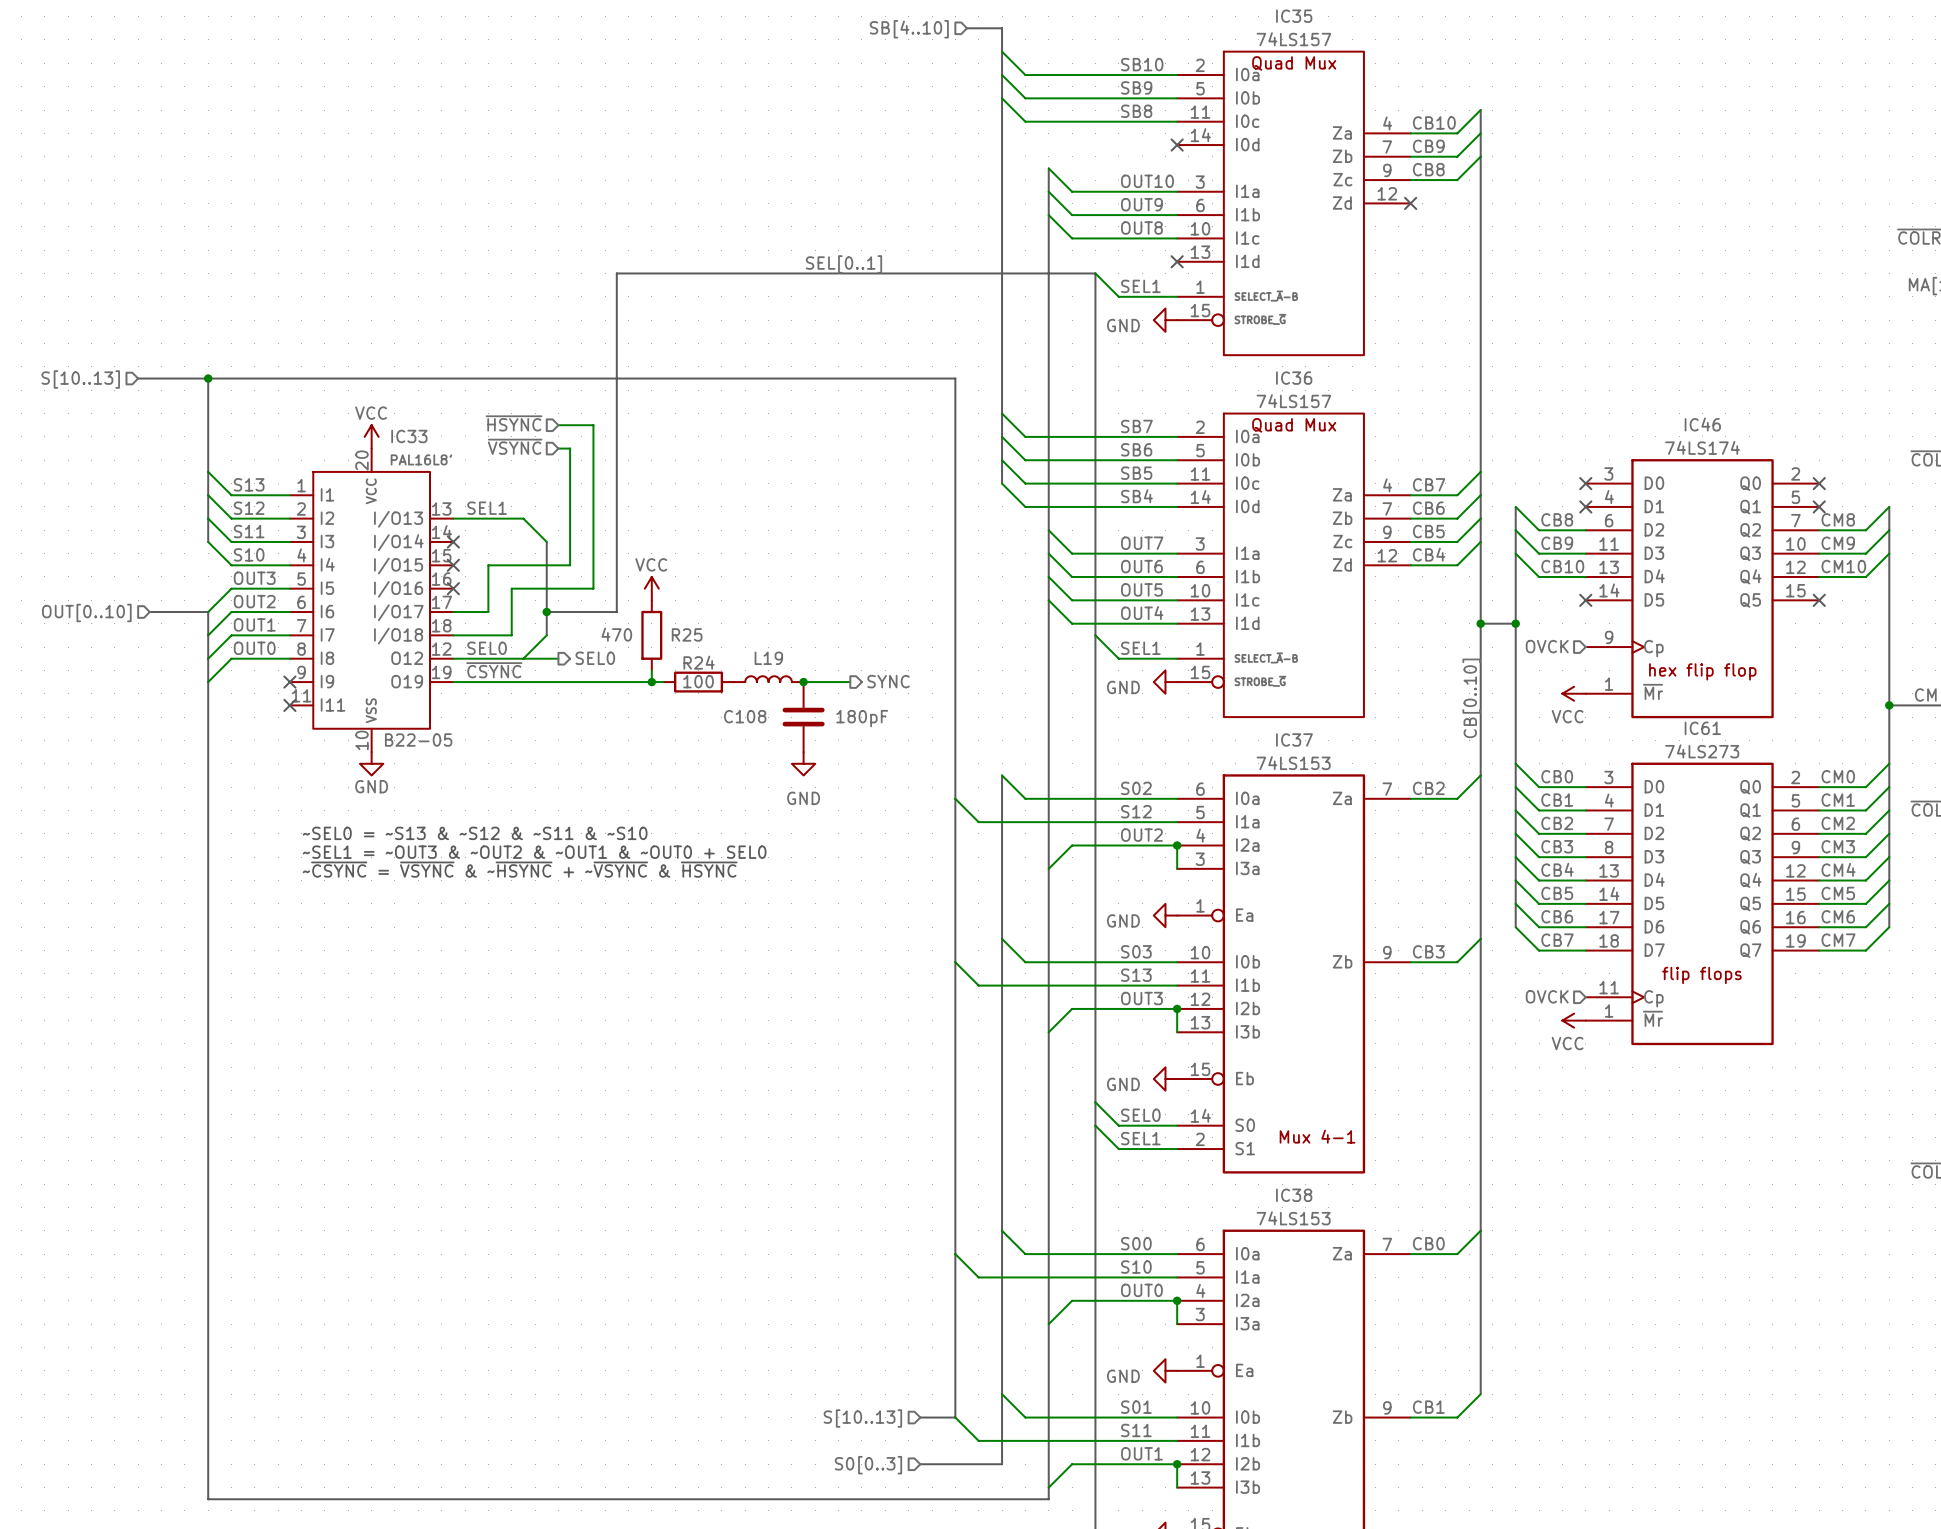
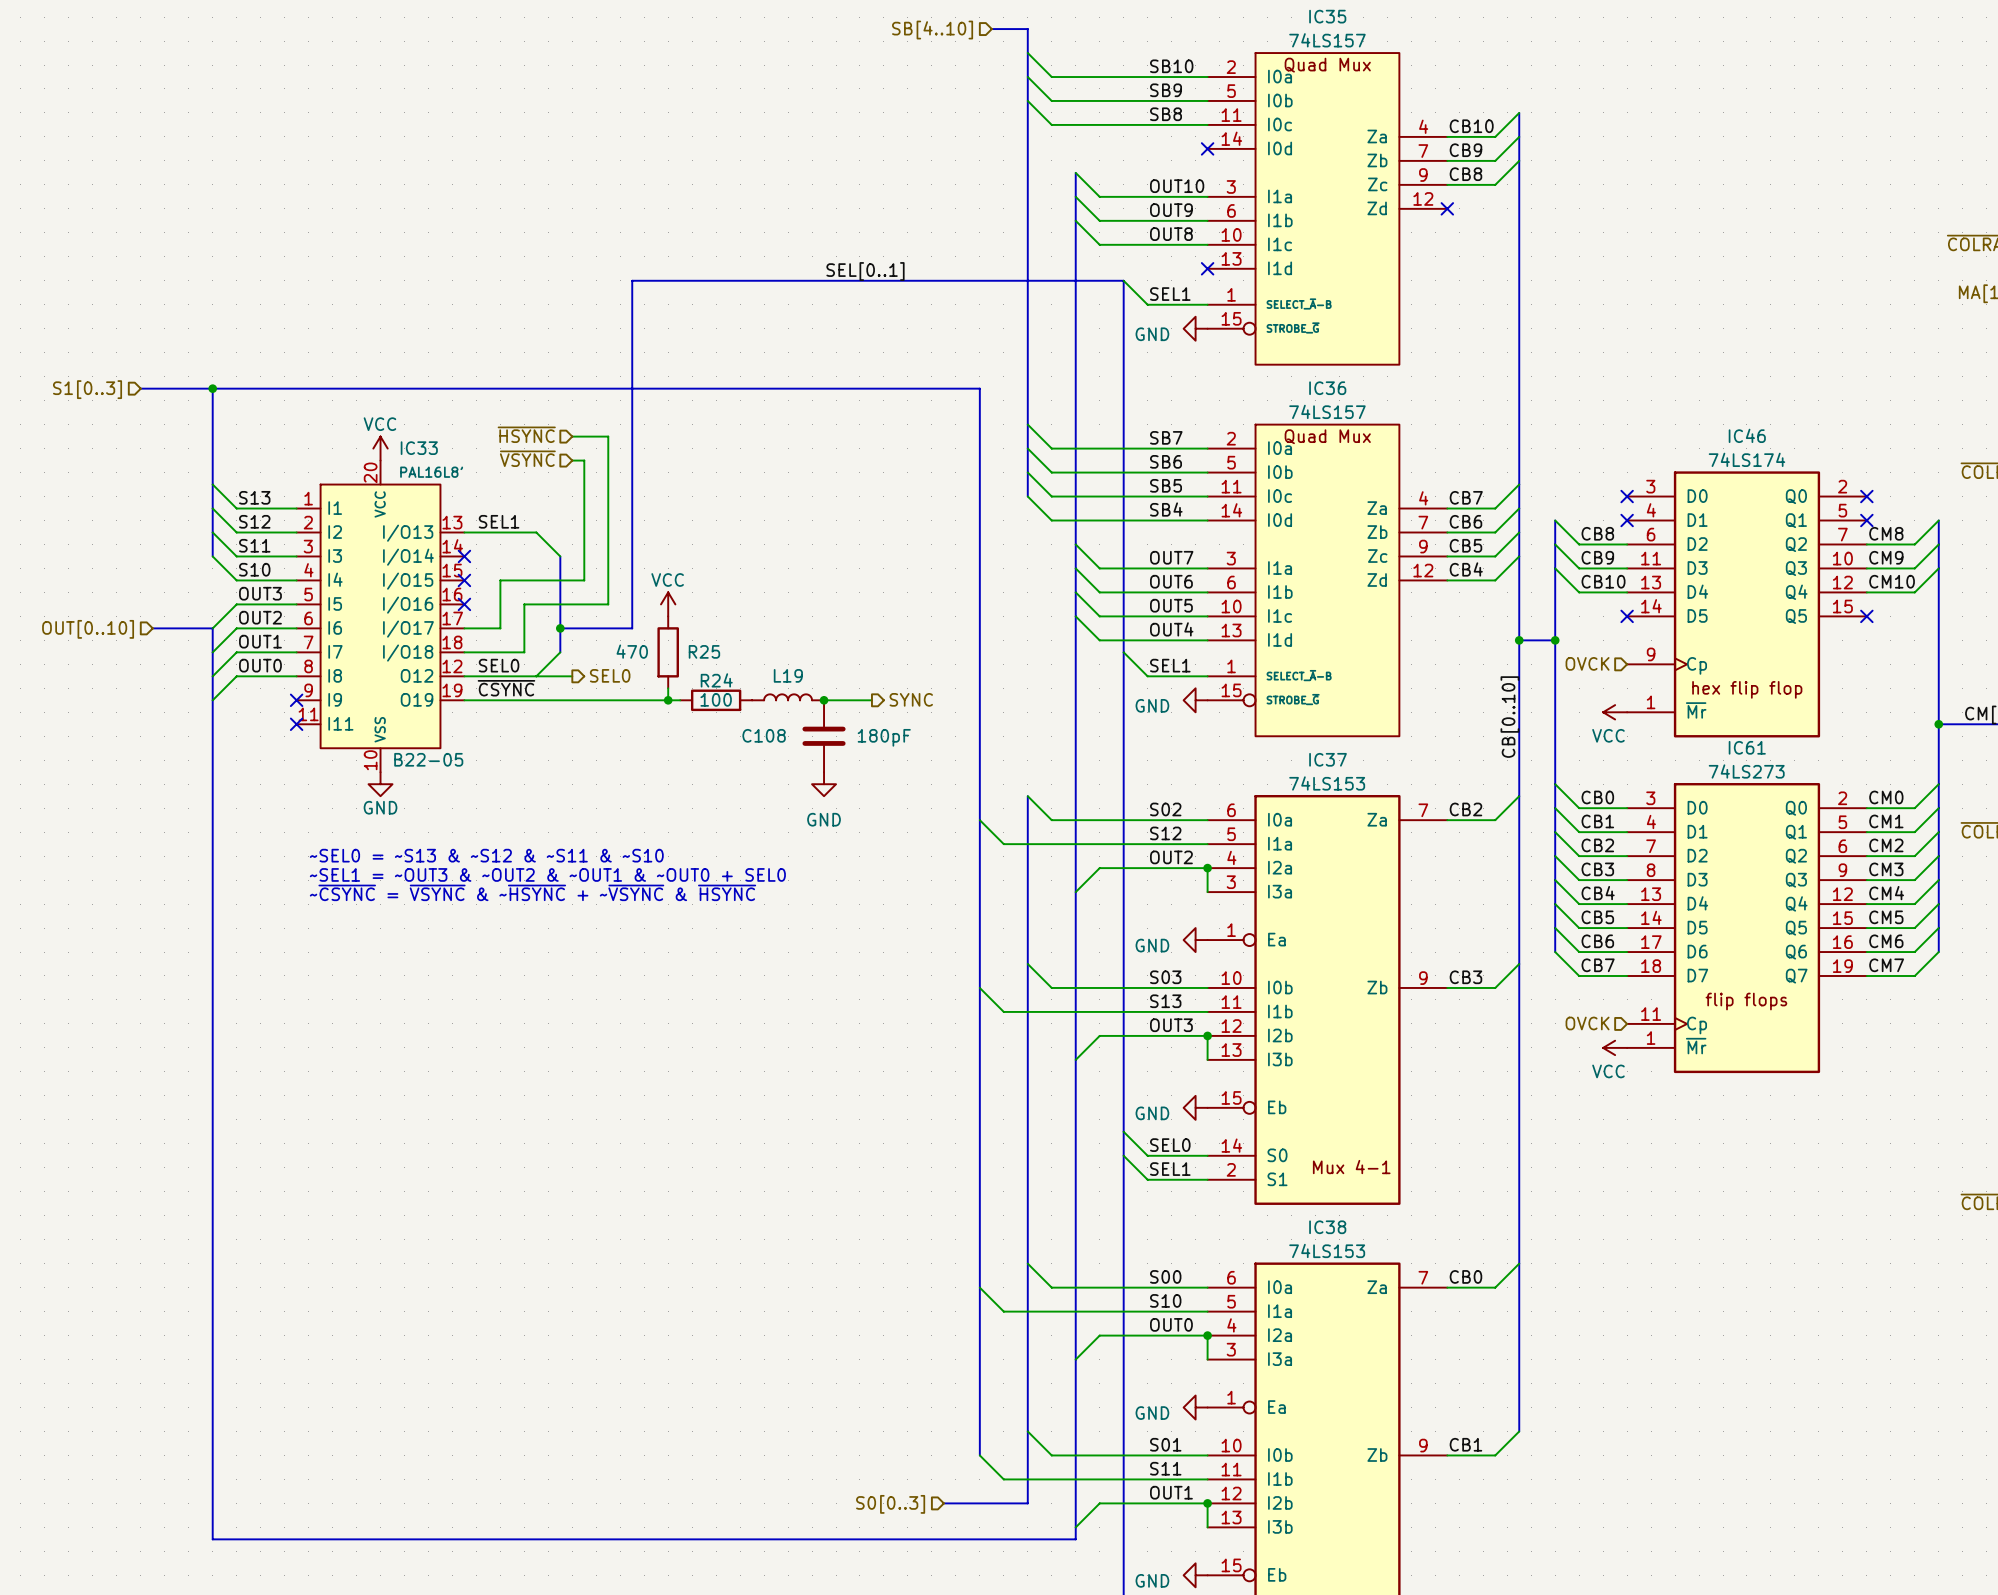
hierarchical label: S[10..13] (80, 379) -> S1[0..3] (87, 389)
bus: (920, 1417) (955, 1417) -> none
hierarchical label: S[10..13] (862, 1418) -> none

